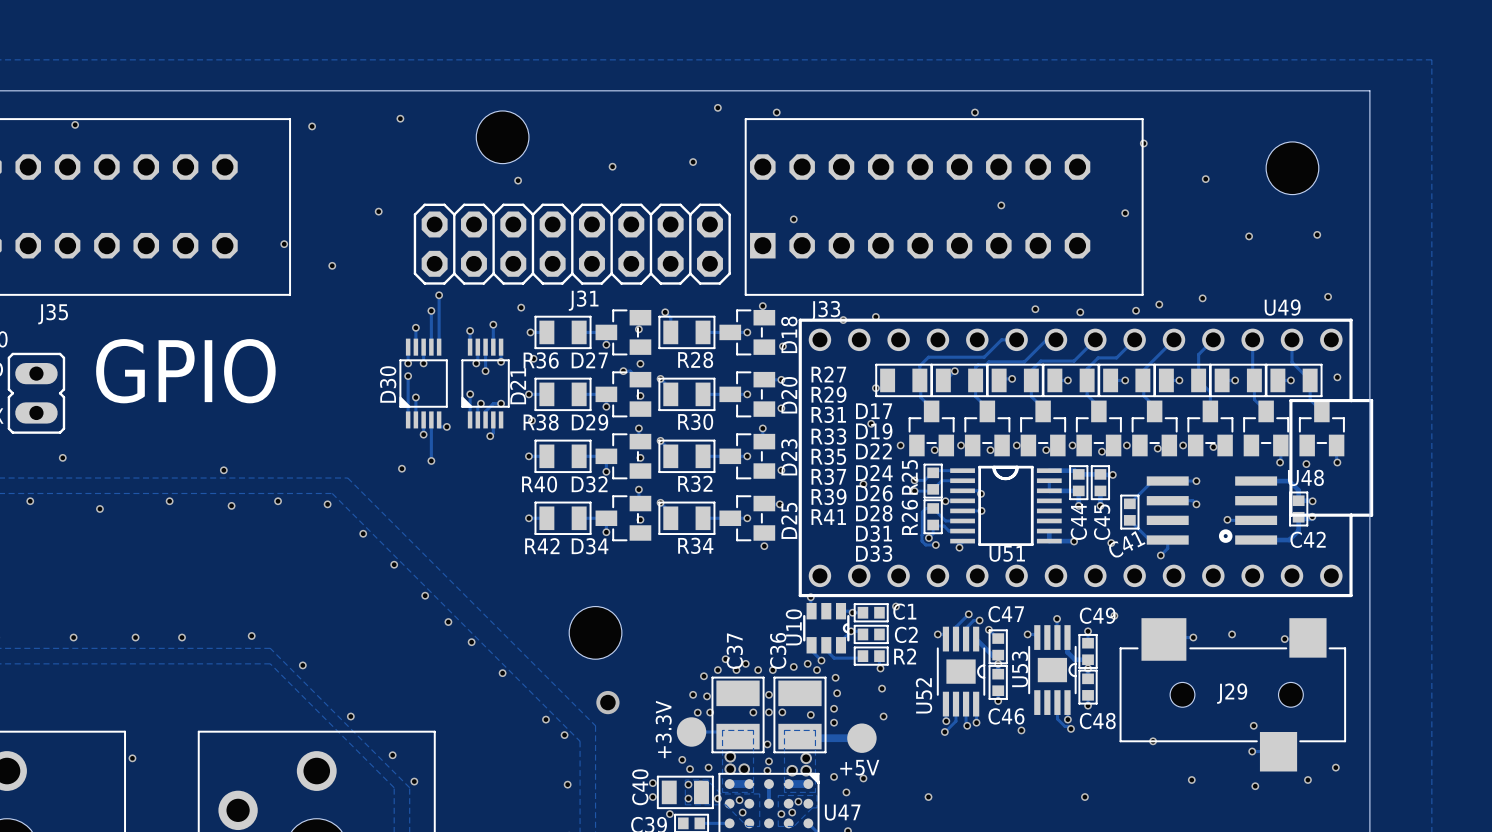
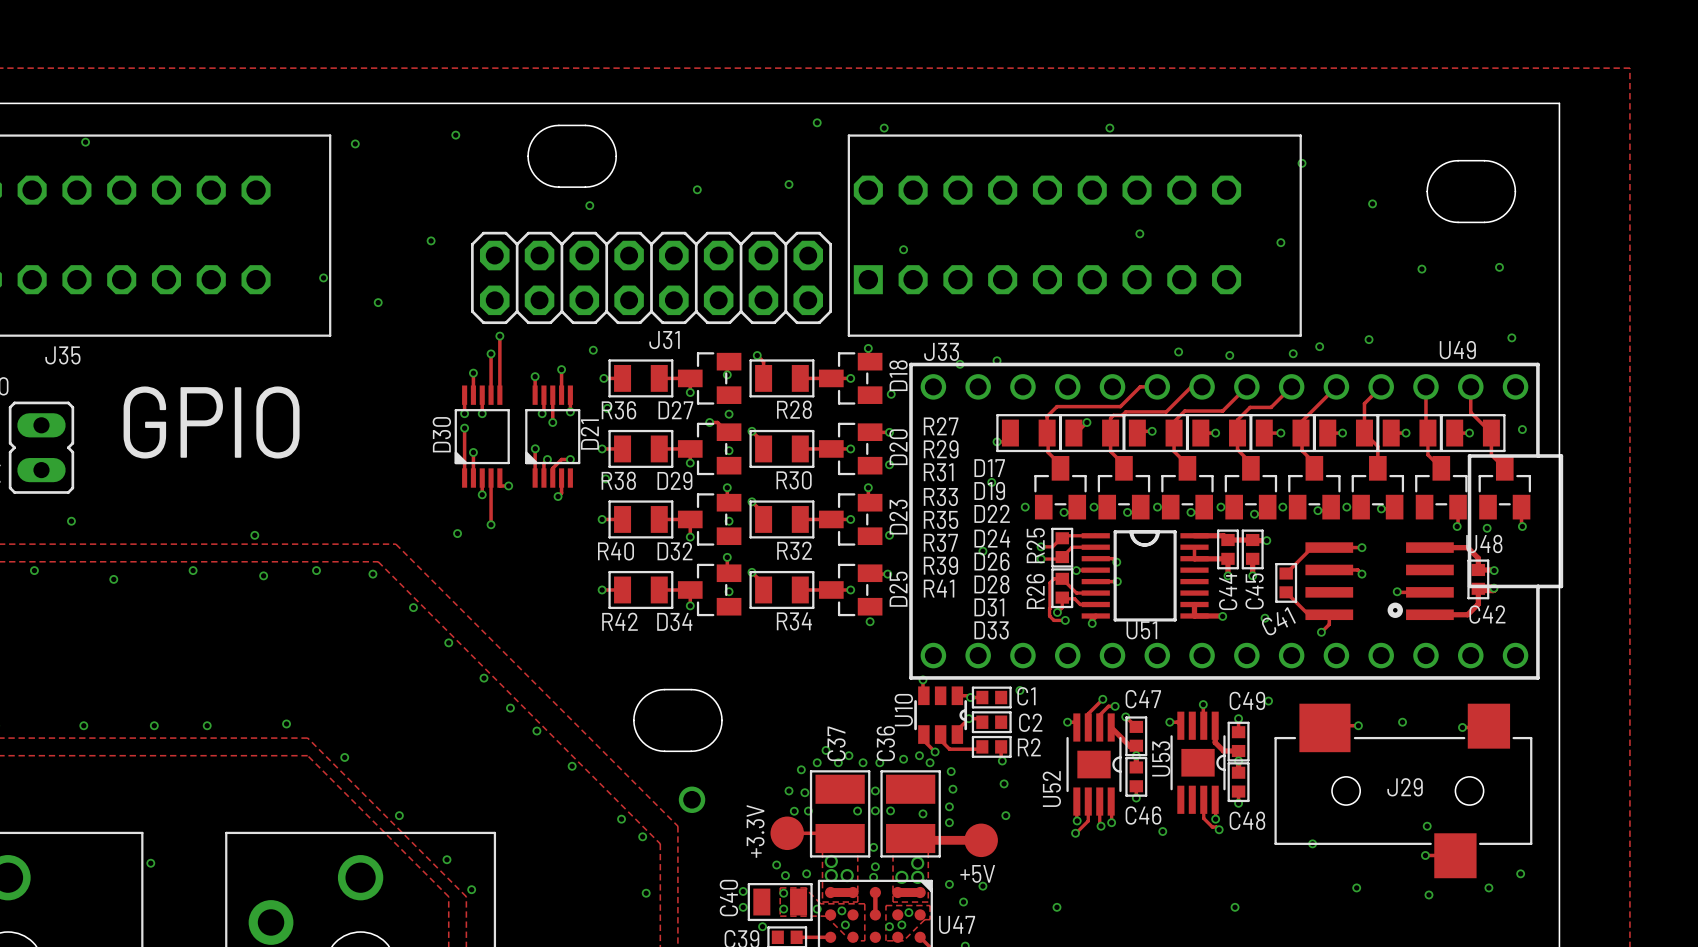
board edge: none -> (558, 125) (593, 126) (604, 131) (609, 137) (615, 148) (615, 160) (612, 171) (604, 180) (589, 186) (554, 186) (543, 183) (534, 175) (528, 160) (530, 144) (540, 131) (550, 126) (558, 125)
hole: (502, 137) -> none
board edge: none -> (1458, 160) (1492, 161) (1503, 167) (1508, 172) (1514, 183) (1515, 195) (1511, 206) (1503, 216) (1488, 222) (1454, 222) (1442, 218) (1433, 210) (1427, 195) (1429, 179) (1439, 167) (1450, 161) (1458, 160)
hole: (1292, 168) -> none
board edge: none -> (664, 689) (699, 690) (709, 695) (715, 701) (720, 712) (721, 724) (717, 735) (709, 744) (695, 751) (660, 751) (649, 747) (640, 739) (634, 724) (636, 708) (645, 695) (656, 690) (664, 689)
hole: (595, 632) -> none

